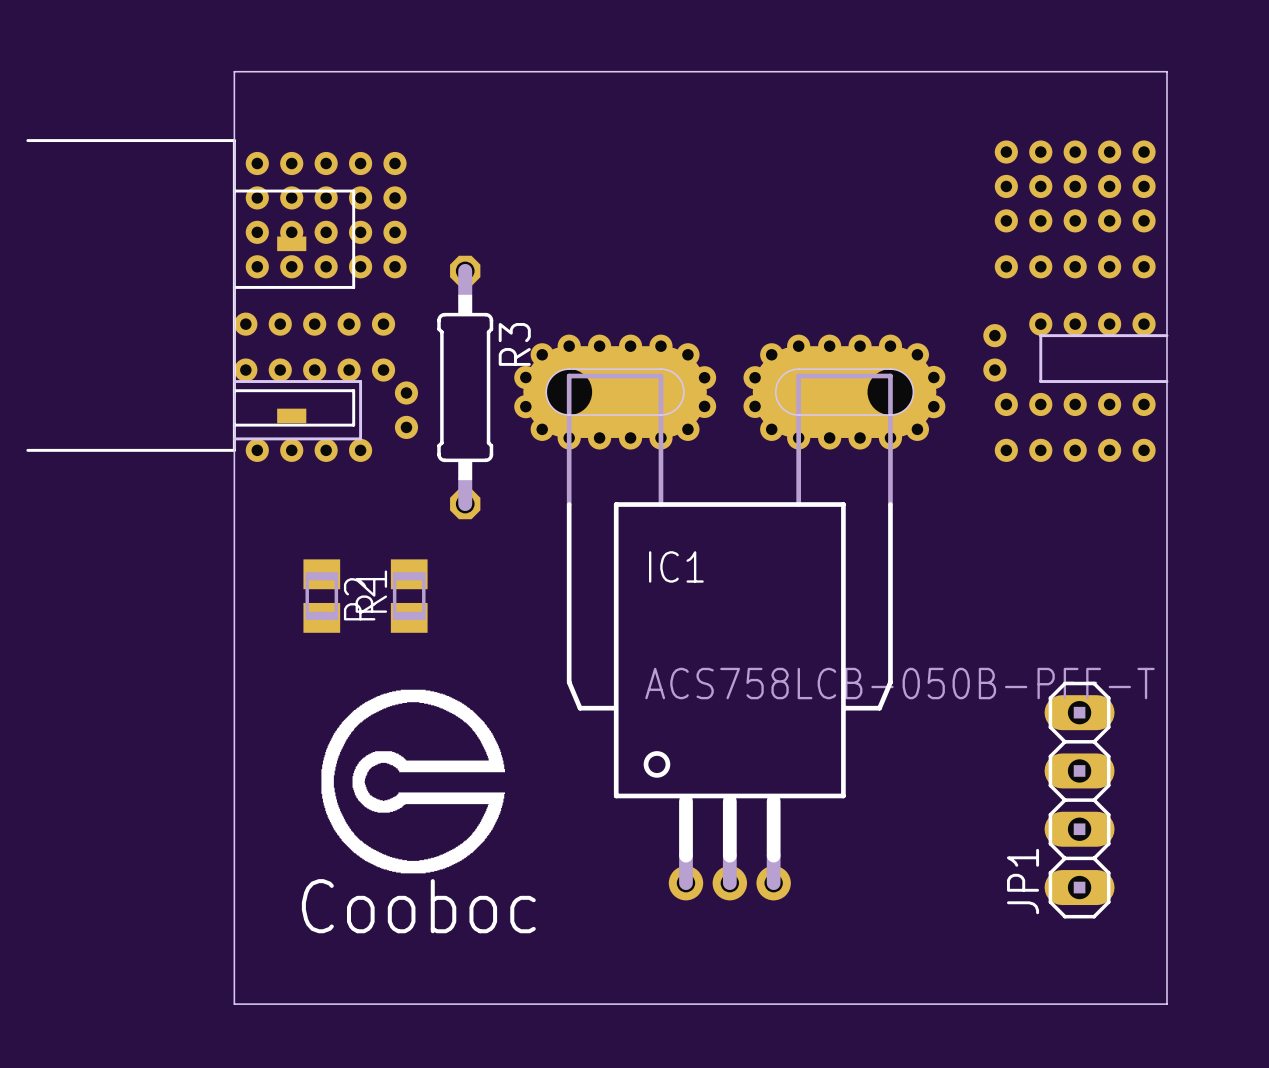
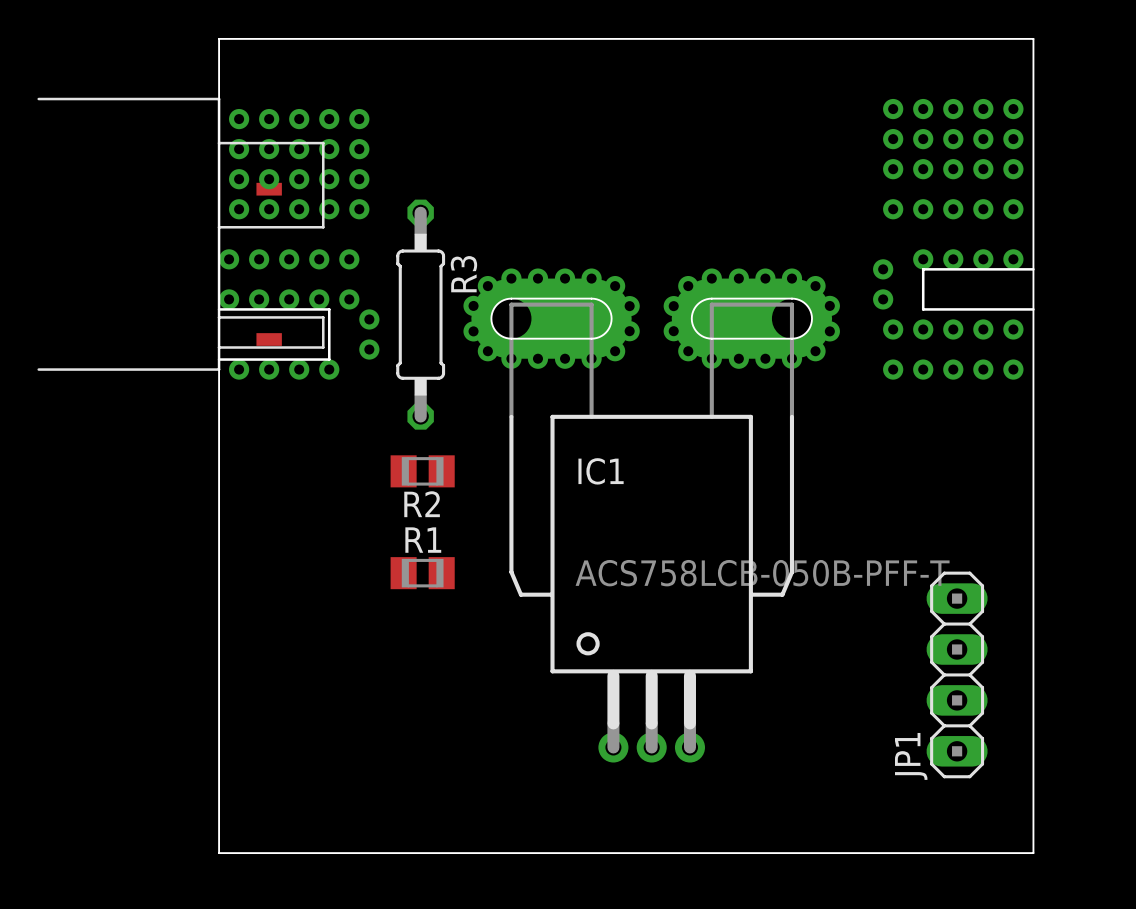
R2 rotation: 0° (321, 596) -> 90° clockwise (422, 471)
R2 position: (321, 596) -> (422, 471)
R1 rotation: 0° (409, 596) -> 90° clockwise (422, 573)
R1 position: (409, 596) -> (422, 573)
drawing: [321, 689, 506, 874] -> none

